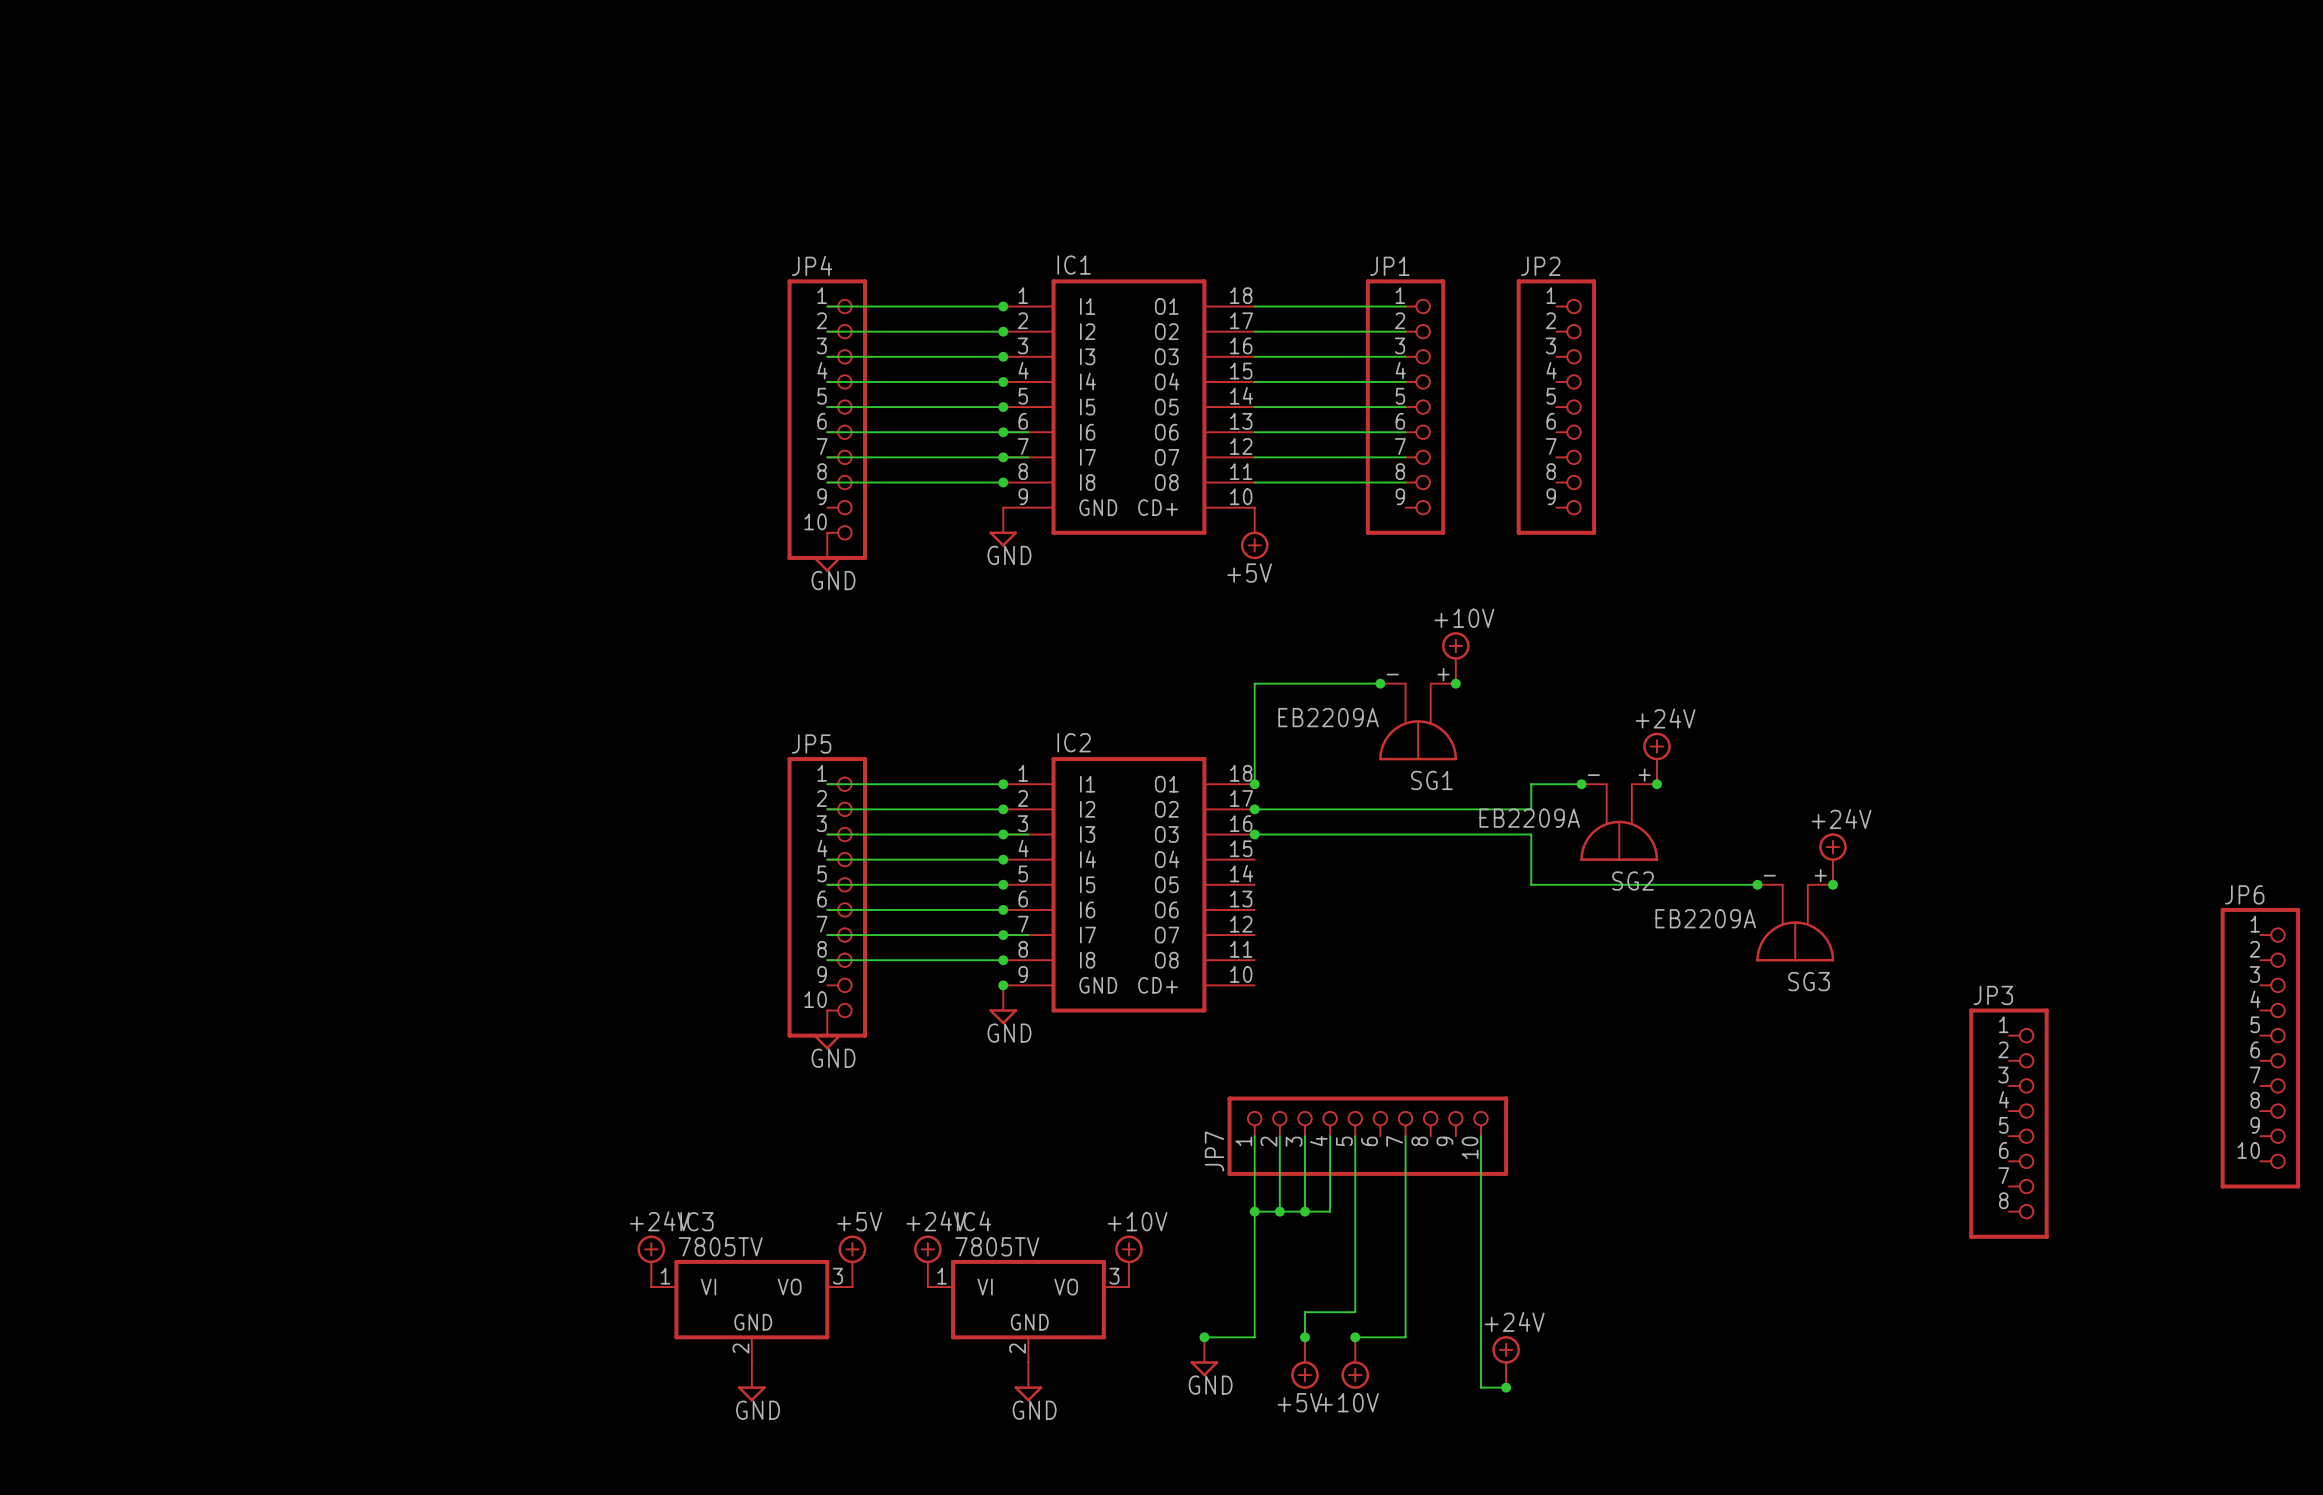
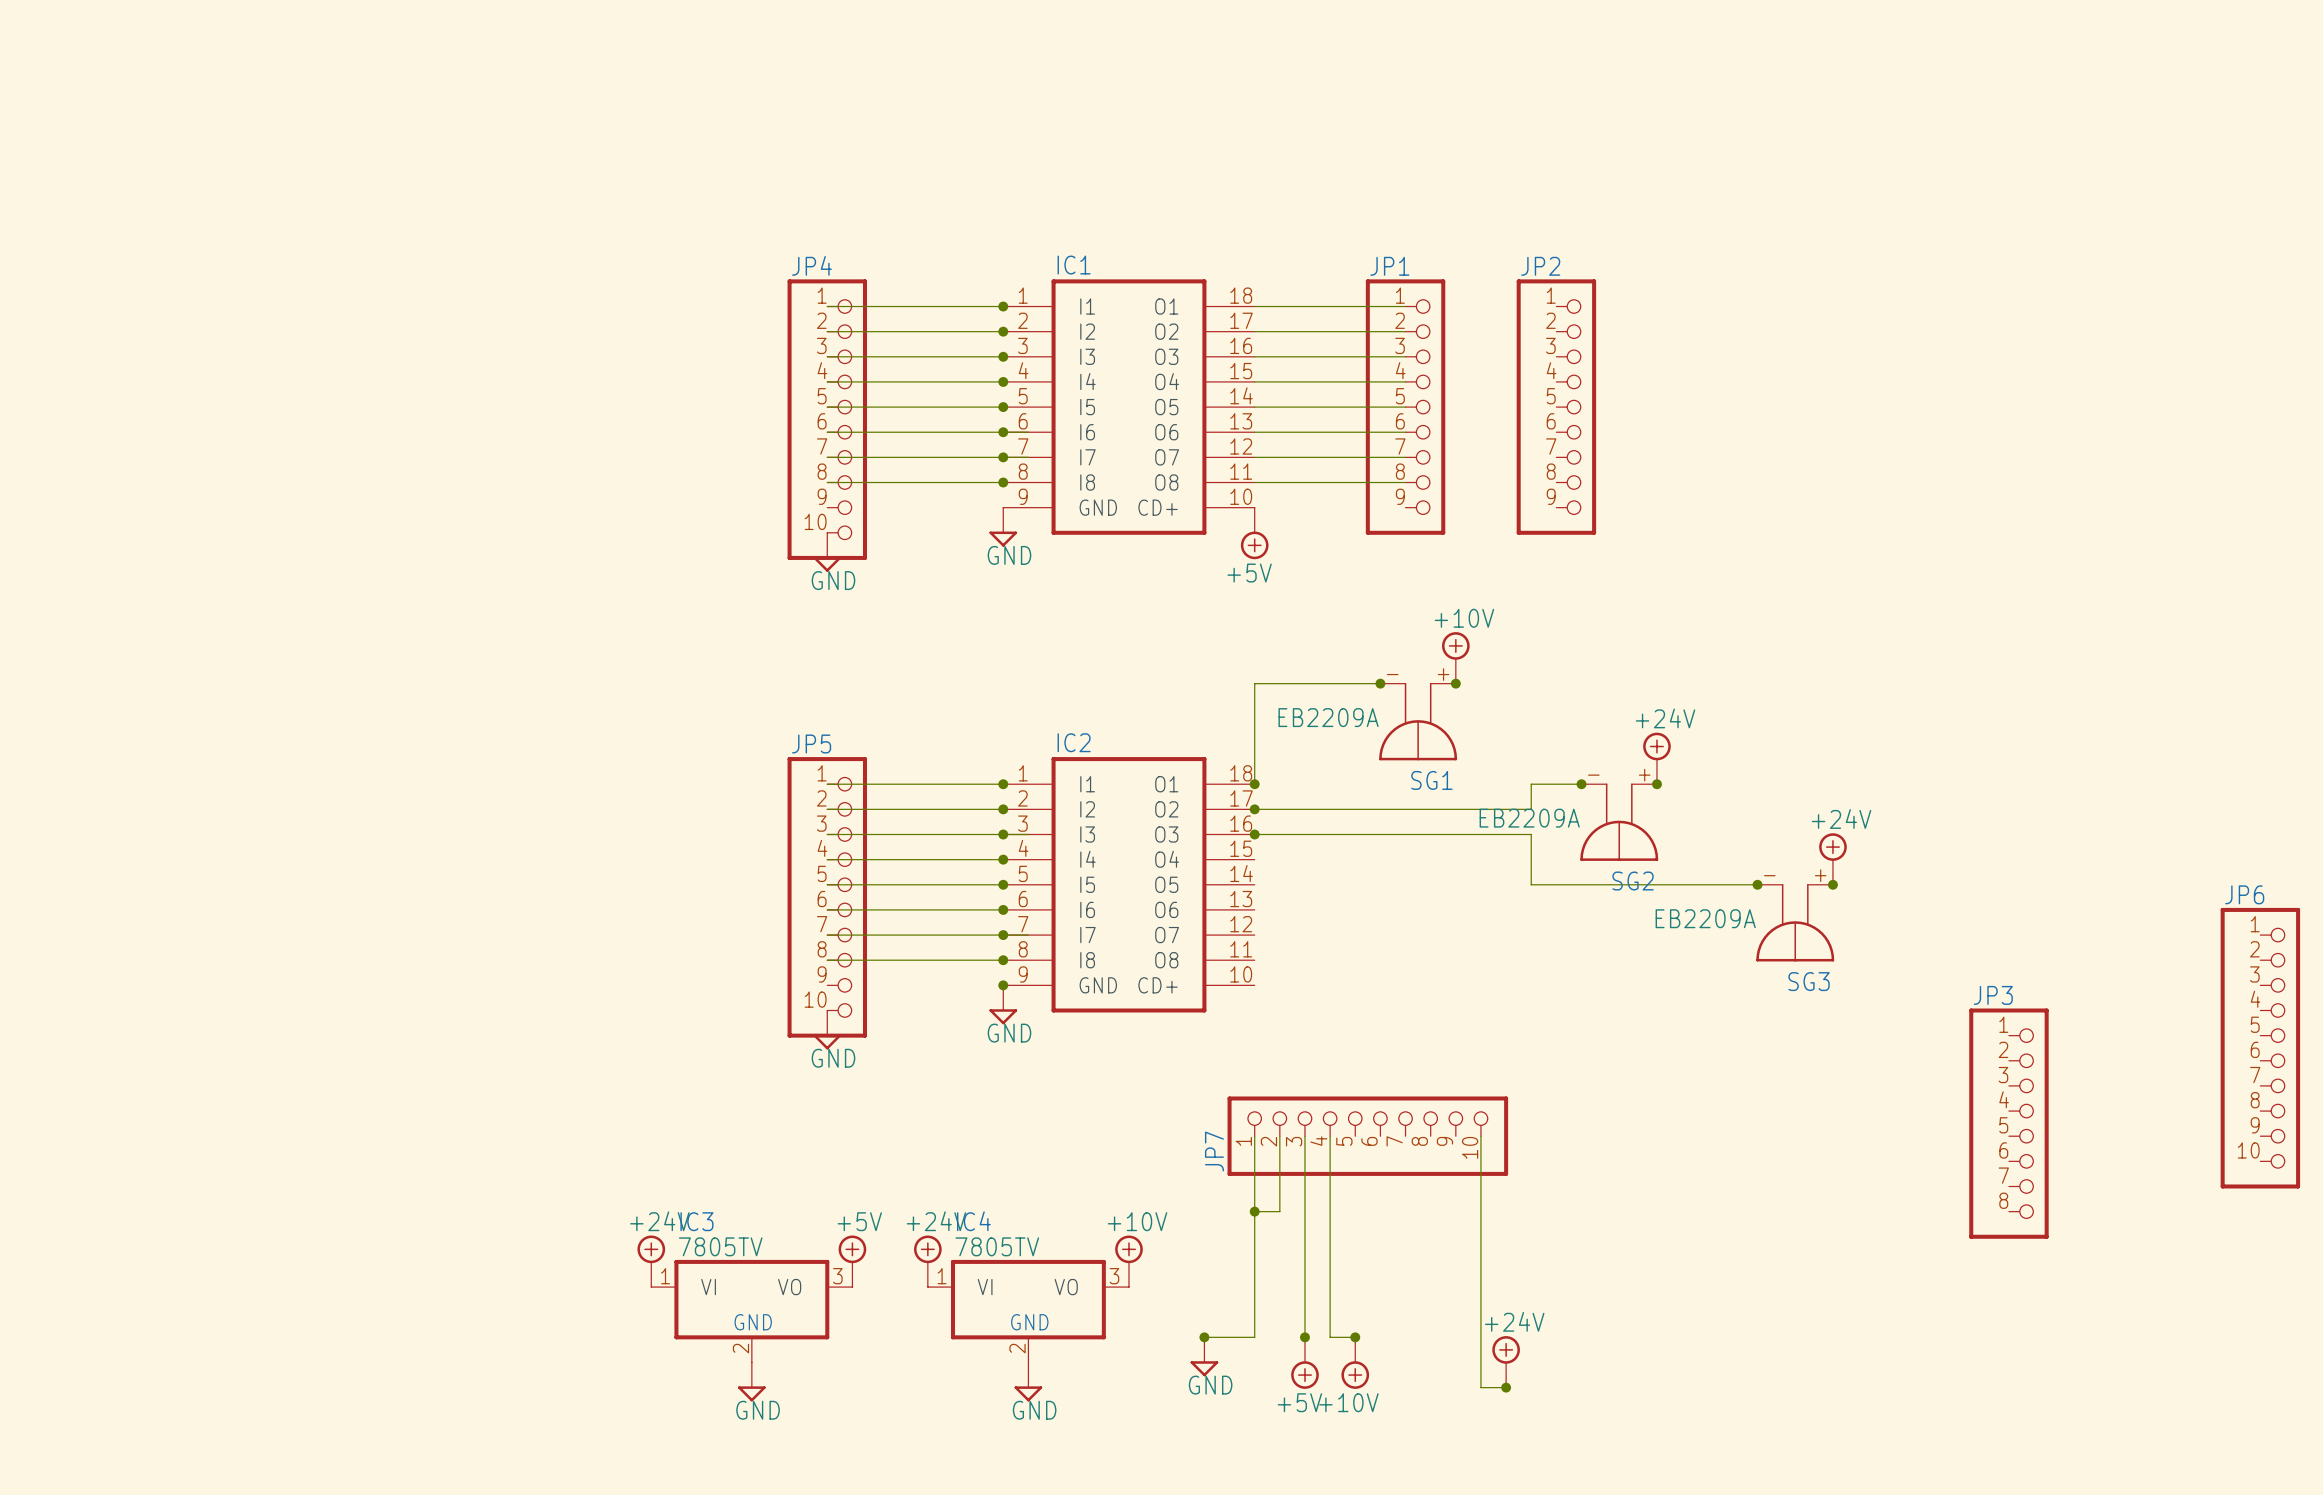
wire: (1355, 1136) (1355, 1312) (1304, 1312) -> (1304, 1211) (1304, 1312)
wire: (1405, 1136) (1405, 1337) (1355, 1337) -> (1330, 1211) (1330, 1337) (1355, 1337)
wire: (1279, 1211) (1330, 1211) -> none
junction: (1279, 1211) -> none
junction: (1304, 1211) -> none

